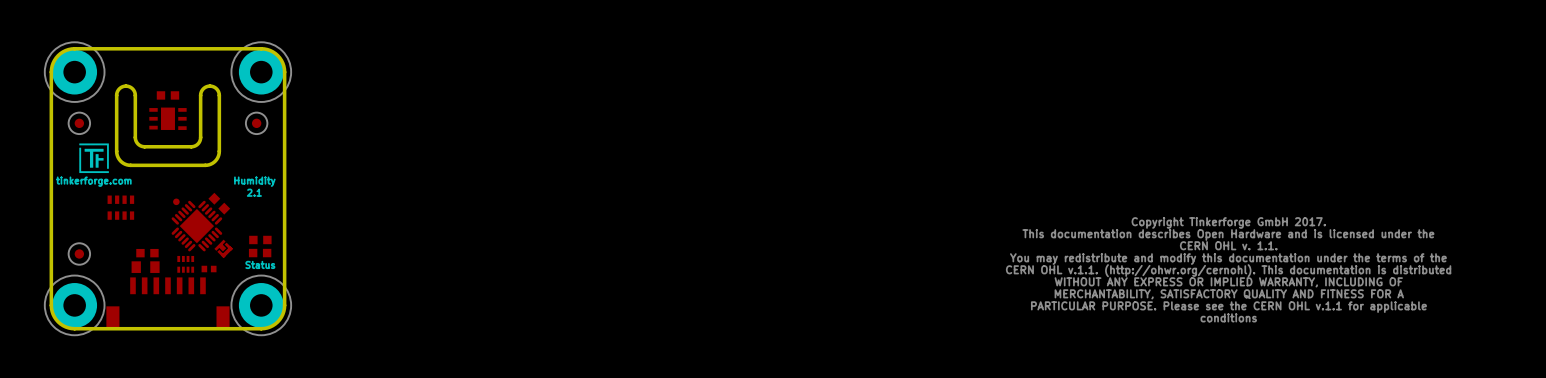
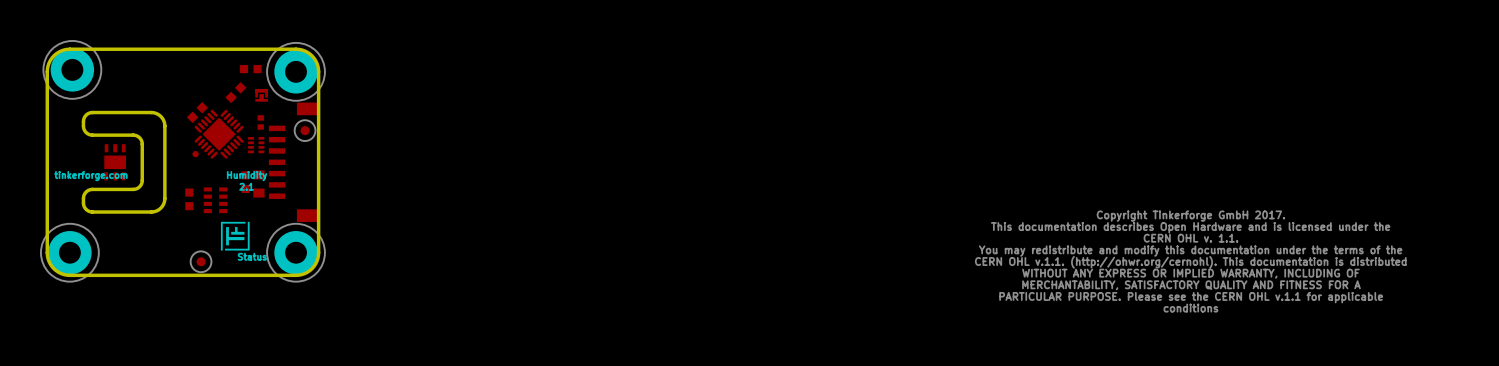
part footprint: [231, 42, 292, 103] -> [239, 65, 262, 74]
board edge: (74, 48) (261, 48) (272, 51) (279, 57) (284, 72) (284, 305) (281, 317) (275, 323) (261, 328) (74, 328) (63, 325) (56, 319) (51, 305) (51, 69) (58, 55) (65, 50) (74, 48) -> (69, 49) (61, 50) (53, 55) (47, 68) (47, 252) (49, 261) (53, 268) (61, 273) (69, 275) (296, 275) (304, 273) (312, 268) (316, 261) (318, 252) (318, 71) (316, 63) (312, 55) (304, 50) (296, 49) (69, 49)
part: none -> (296, 71)
board edge: (116, 95) (116, 153) (122, 162) (130, 165) (205, 165) -> none
board edge: (116, 95) (118, 89) (123, 86) (129, 86) (134, 90) (135, 138) (138, 144) (144, 146) (191, 146) (196, 144) (200, 138) (201, 91) (205, 87) (211, 86) (217, 89) (219, 95) -> none
part: (167, 95) -> none
board edge: (219, 95) (219, 151) -> none
part: none -> (235, 92)
part: none -> (261, 95)
board edge: none -> (92, 112) (153, 112) (162, 117) (164, 126) (164, 198) (159, 209) (151, 212) (92, 212) (85, 208) (83, 196) (89, 190) (134, 189) (139, 186) (142, 181) (142, 144) (140, 138) (134, 135) (87, 133) (83, 128) (83, 119) (87, 114) (92, 112)
part: none -> (197, 112)
part rotation: 0° (167, 118) -> 90° clockwise (115, 162)
part position: (167, 118) -> (115, 162)
part: (79, 123) -> none
part position: (256, 123) -> (305, 130)
part: none -> (260, 122)
drawing: [79, 143, 109, 174] -> none
board edge: (219, 151) (215, 161) (205, 165) -> none
part: none -> (245, 182)
part footprint: [208, 192, 231, 215] -> [203, 187, 228, 214]
part position: (176, 201) -> (195, 154)
part: none -> (189, 199)
part: (120, 207) -> none
part position: (196, 226) -> (219, 134)
drawing: none -> [220, 221, 250, 251]
part: (260, 239) -> none
part: (223, 248) -> none
part: (79, 253) -> none
part: (147, 253) -> none
part: (260, 253) -> none
part rotation: 0° (185, 264) -> 90° clockwise (256, 145)
part position: (185, 264) -> (256, 145)
part footprint: [201, 265, 217, 273] -> [190, 251, 212, 273]
part rotation: 0° (145, 267) -> 90° clockwise (258, 183)
part position: (145, 267) -> (258, 183)
part rotation: 0° (167, 303) -> 90° counterclockwise (293, 162)
part position: (167, 303) -> (293, 162)
part position: (74, 305) -> (69, 252)
part position: (261, 305) -> (296, 252)

